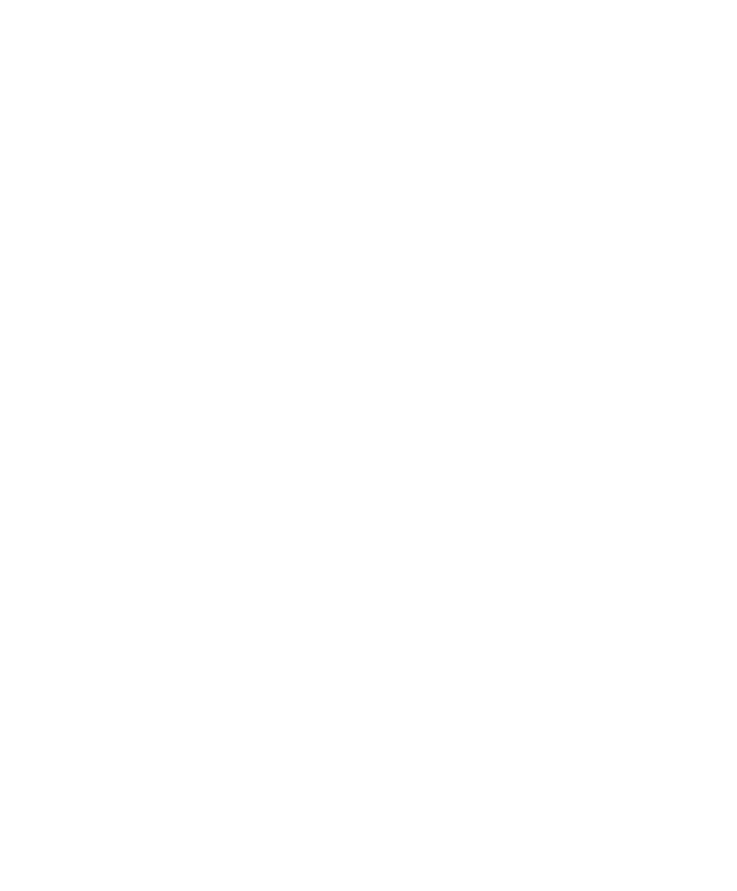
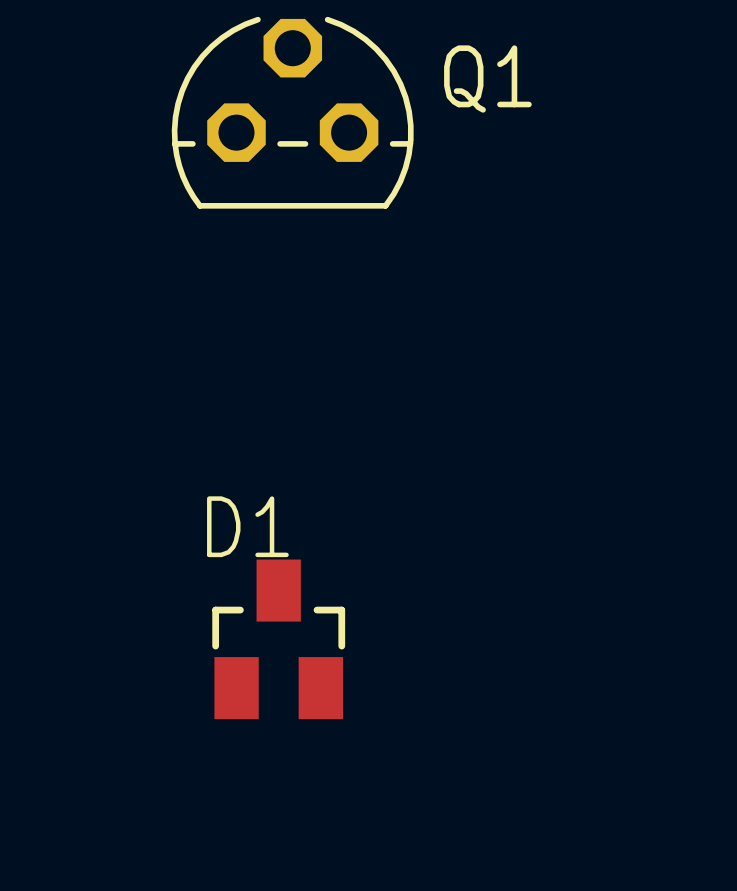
Q1: none -> (292, 112)
D1: none -> (278, 639)

